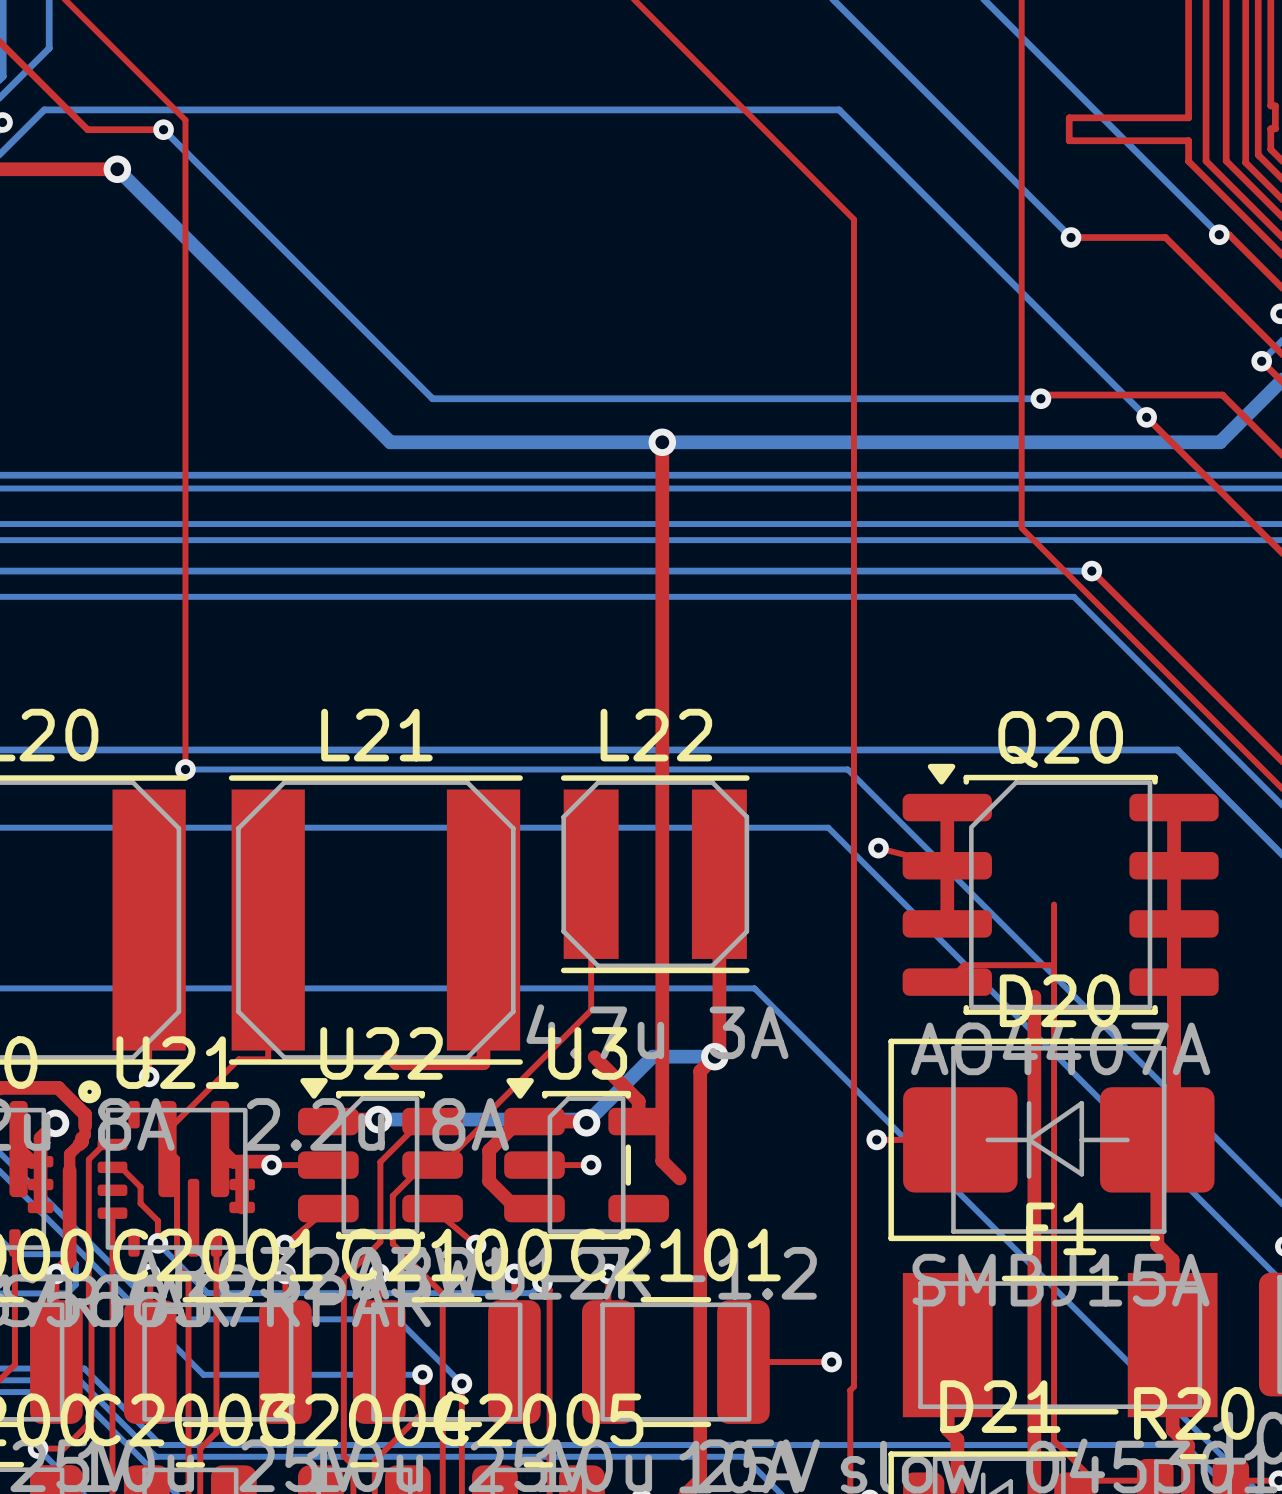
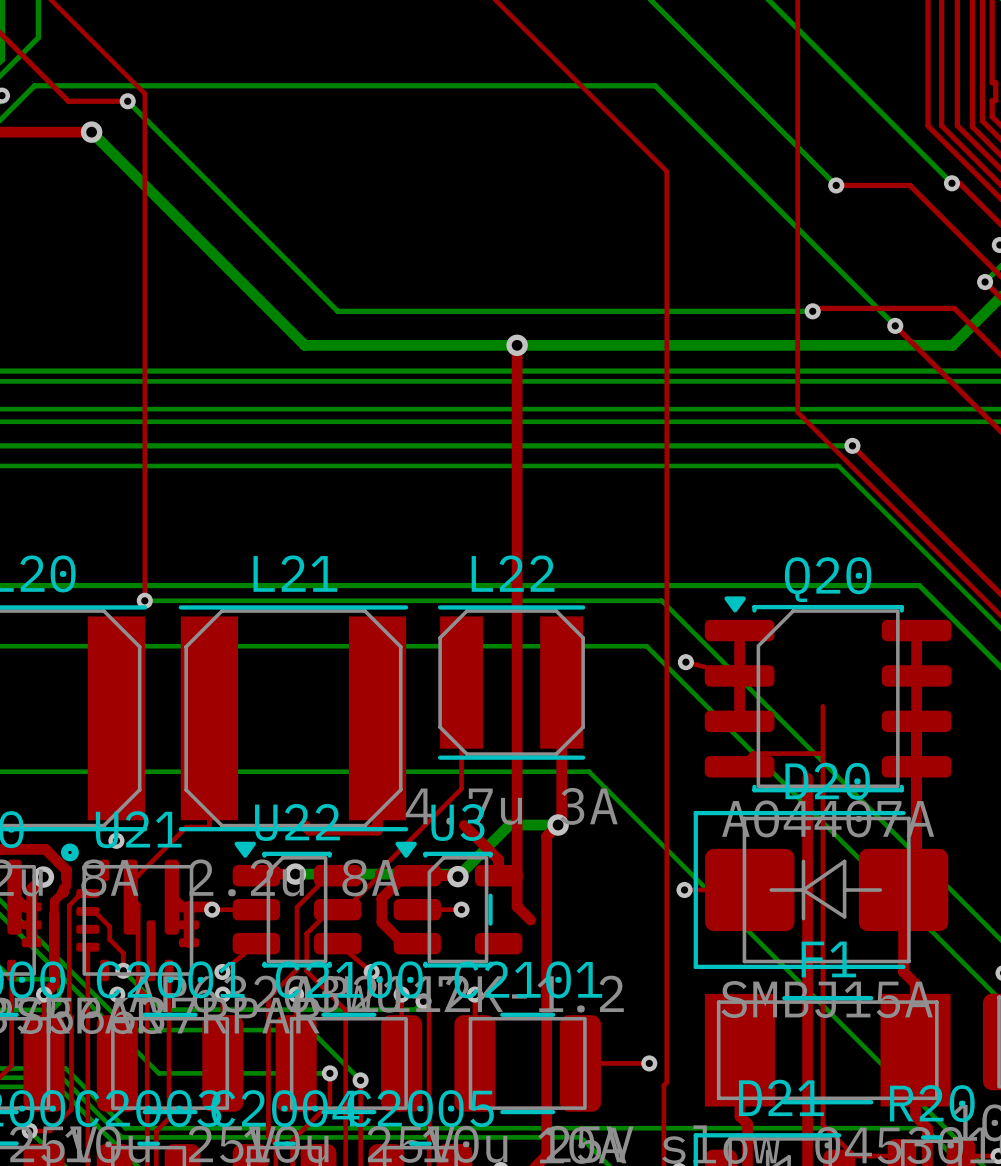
top track: (1188, 117) (1069, 117) (1069, 140) (1188, 140) -> (927, 91) (927, 109)

